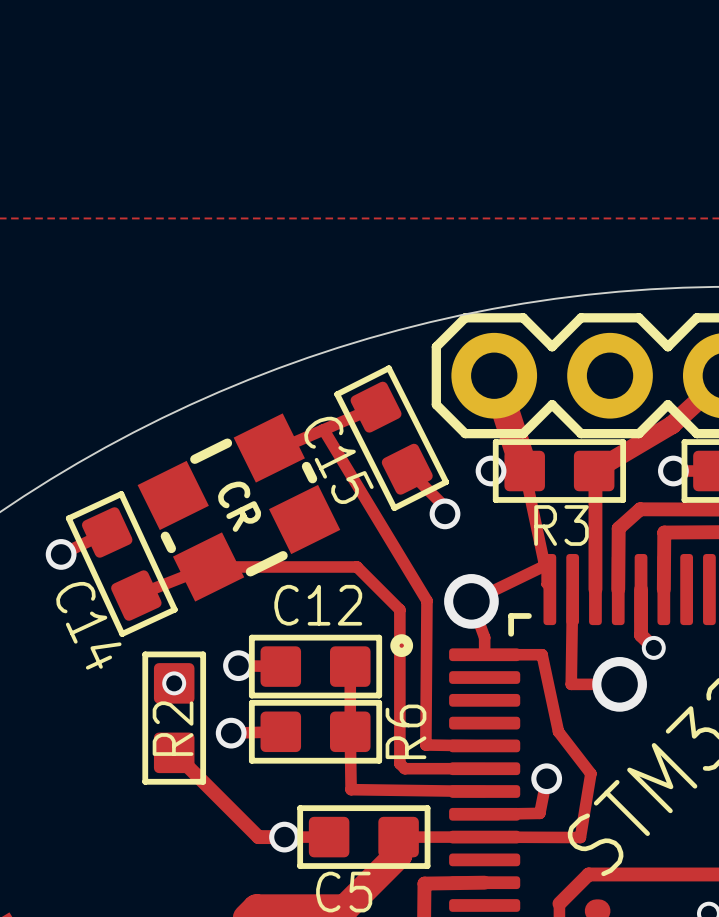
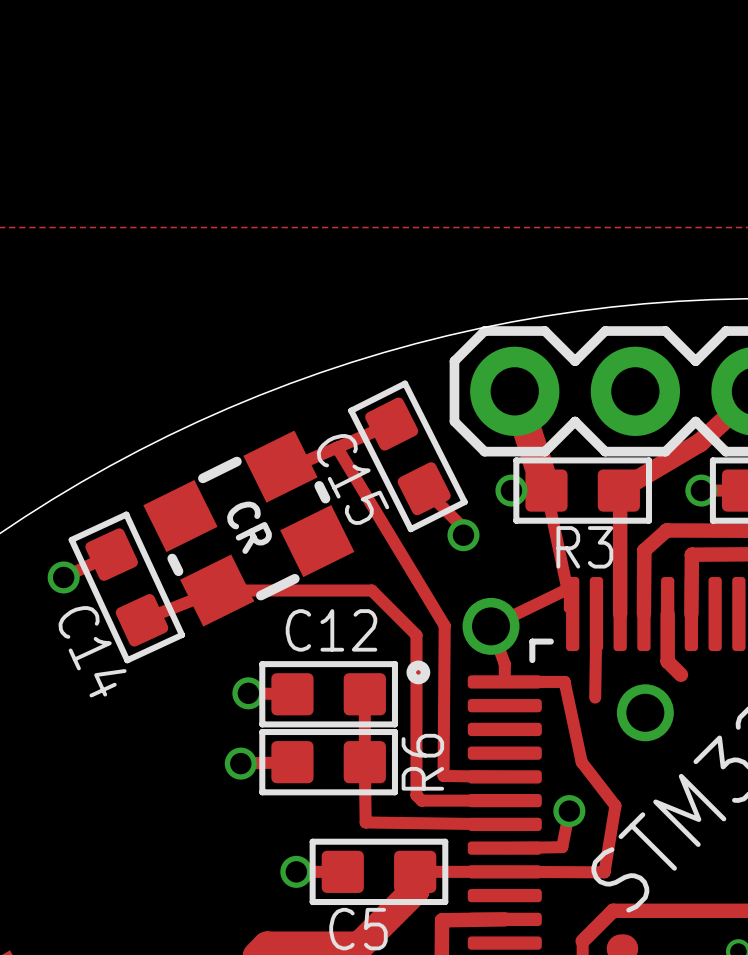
via: (653, 647) -> none
track: (571, 669) (571, 684) (619, 684) -> none
via: (174, 683) -> none
R2: (174, 718) -> none
track: (174, 752) (258, 837) (284, 837) -> none

